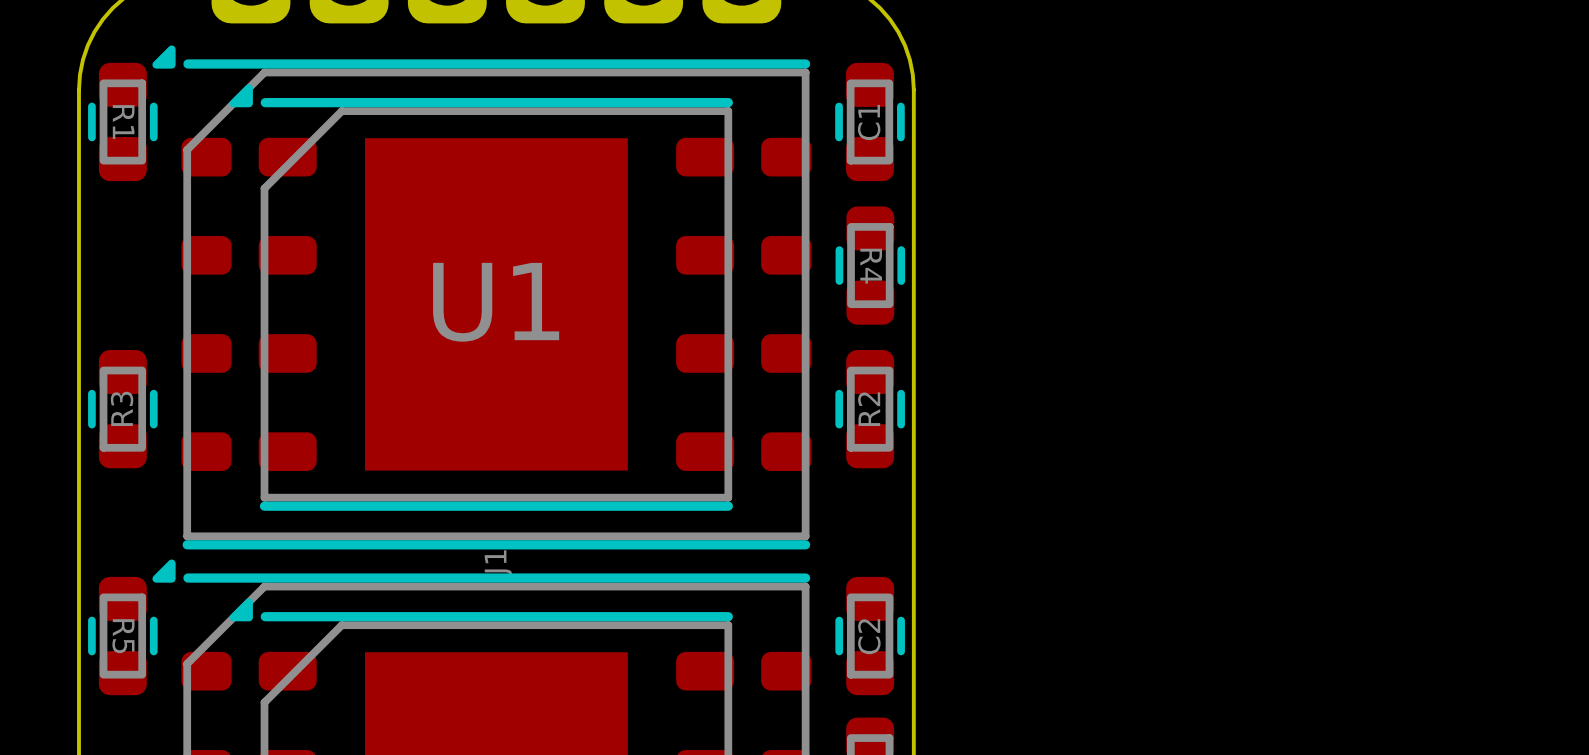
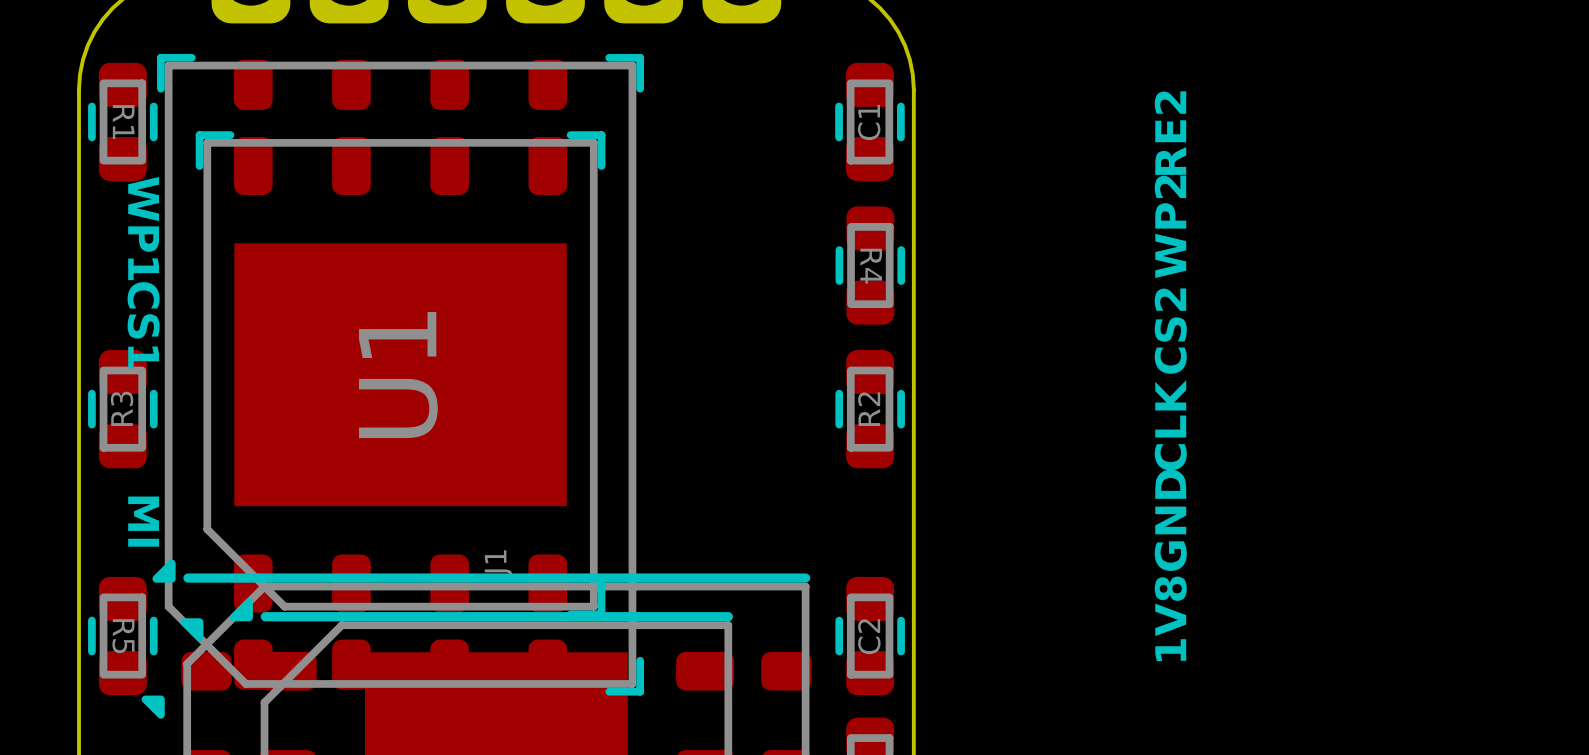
U1 footprint: [152, 45, 812, 550] -> [141, 53, 645, 719]
text: none -> RE2 (1170, 133)
text: none -> WP2 (1170, 226)
text: none -> WP1 (143, 228)
text: none -> CS1 (143, 325)
text: none -> CS2 (1170, 331)
text: none -> CLK (1170, 425)
text: none -> GND (1170, 520)
text: none -> MI (143, 521)
text: none -> 1V8 (1170, 618)

